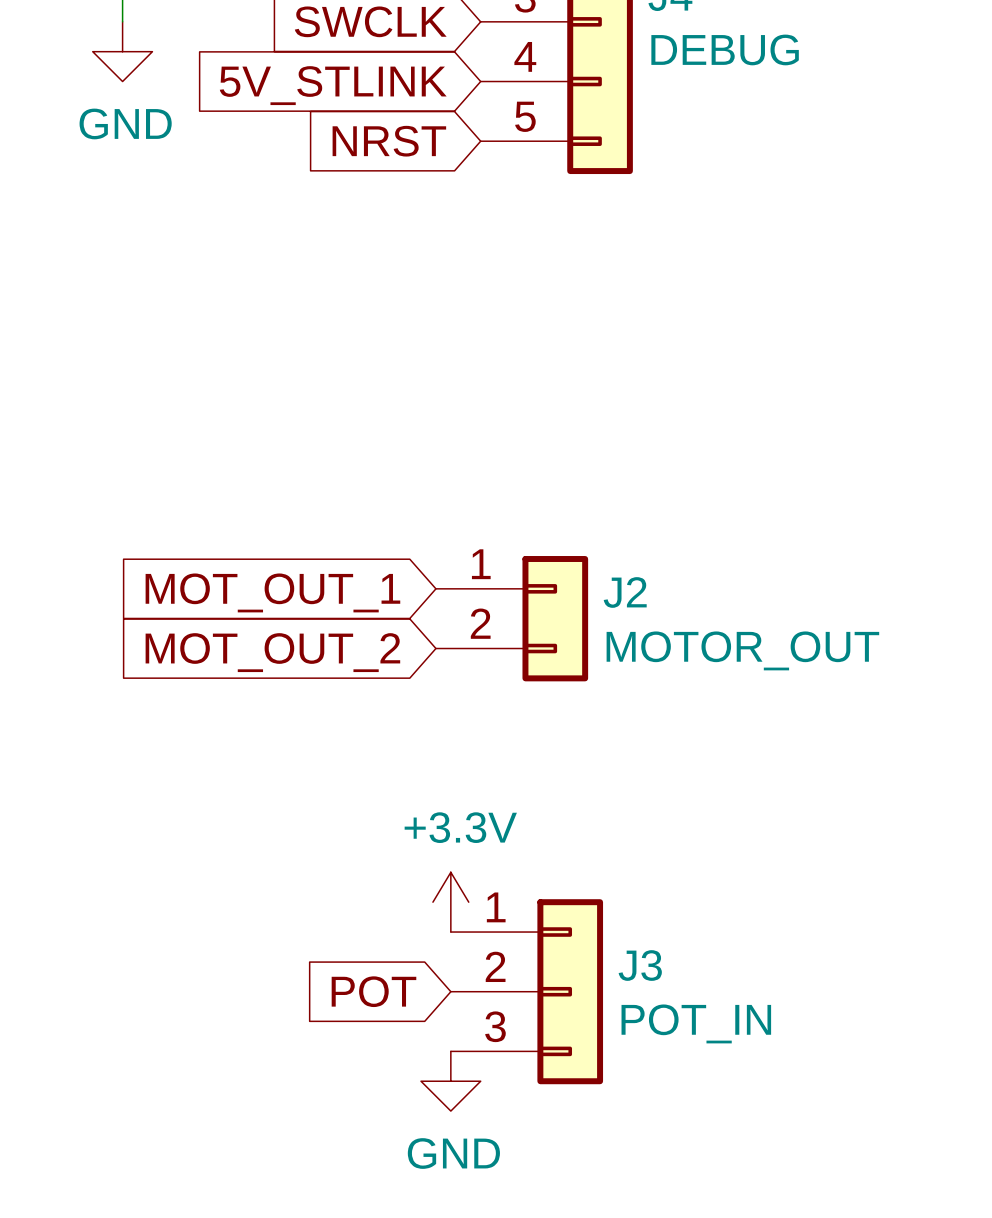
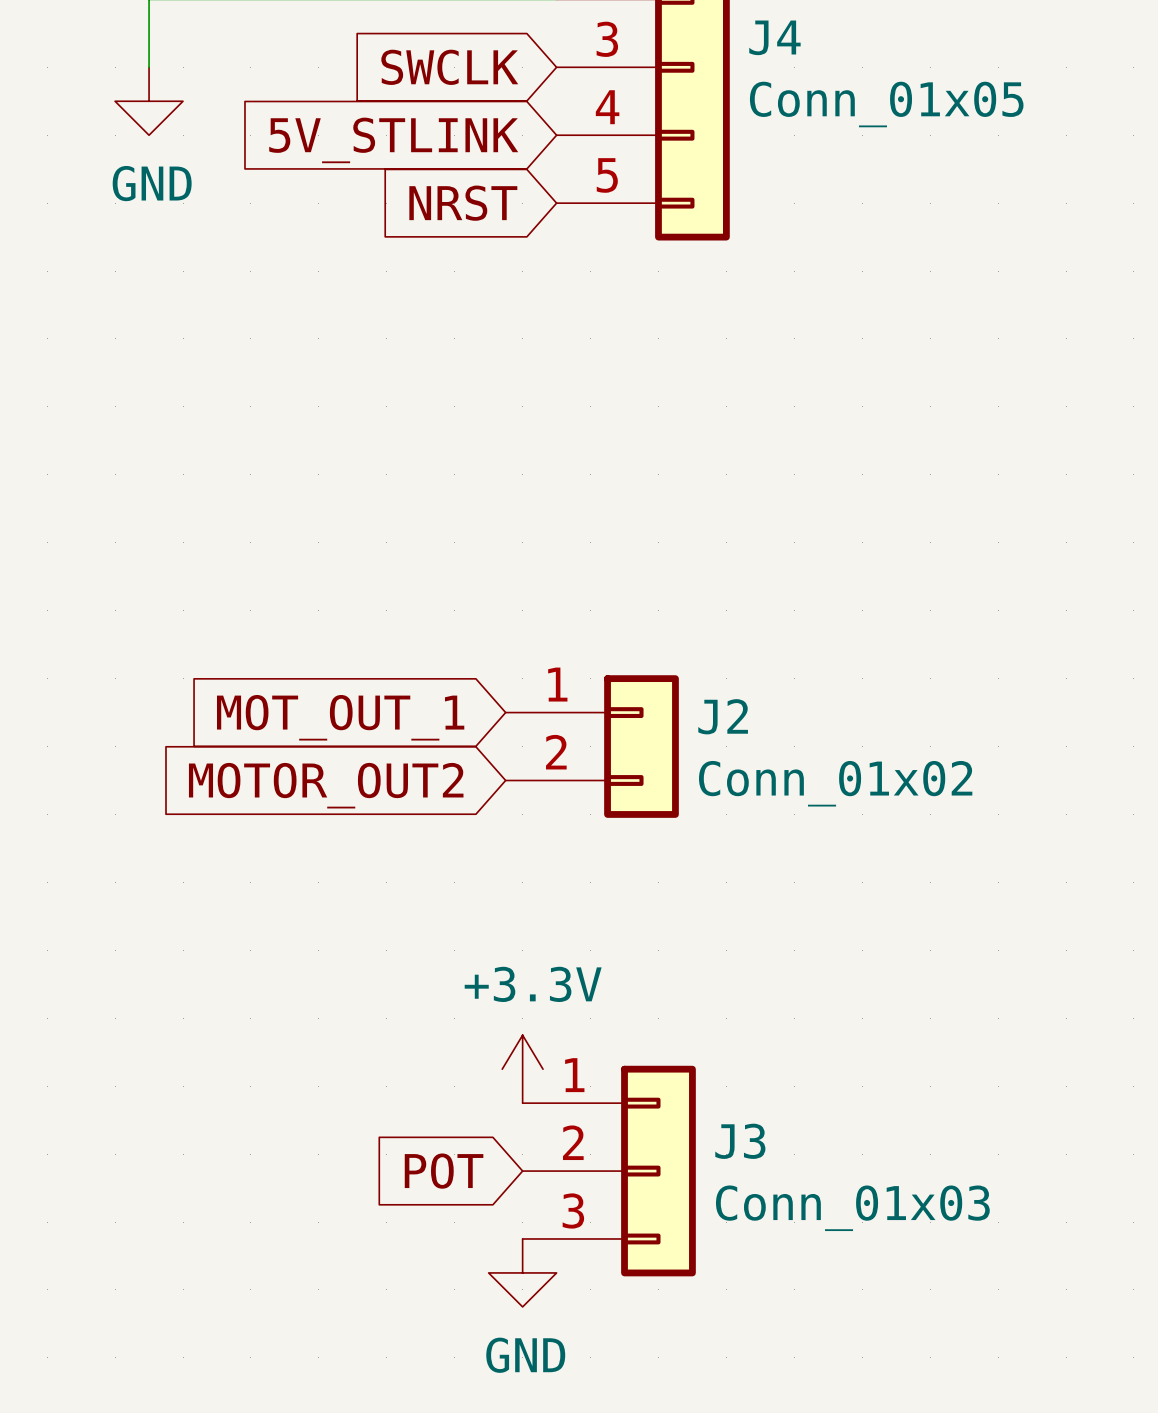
J4 value: DEBUG (725, 49) -> Conn_01x05 (886, 104)
J2 value: MOTOR_OUT (742, 650) -> Conn_01x02 (835, 783)
global label: MOT_OUT_2 (272, 652) -> MOTOR_OUT2 (326, 785)
J3 value: POT_IN (696, 1023) -> Conn_01x03 (852, 1208)

